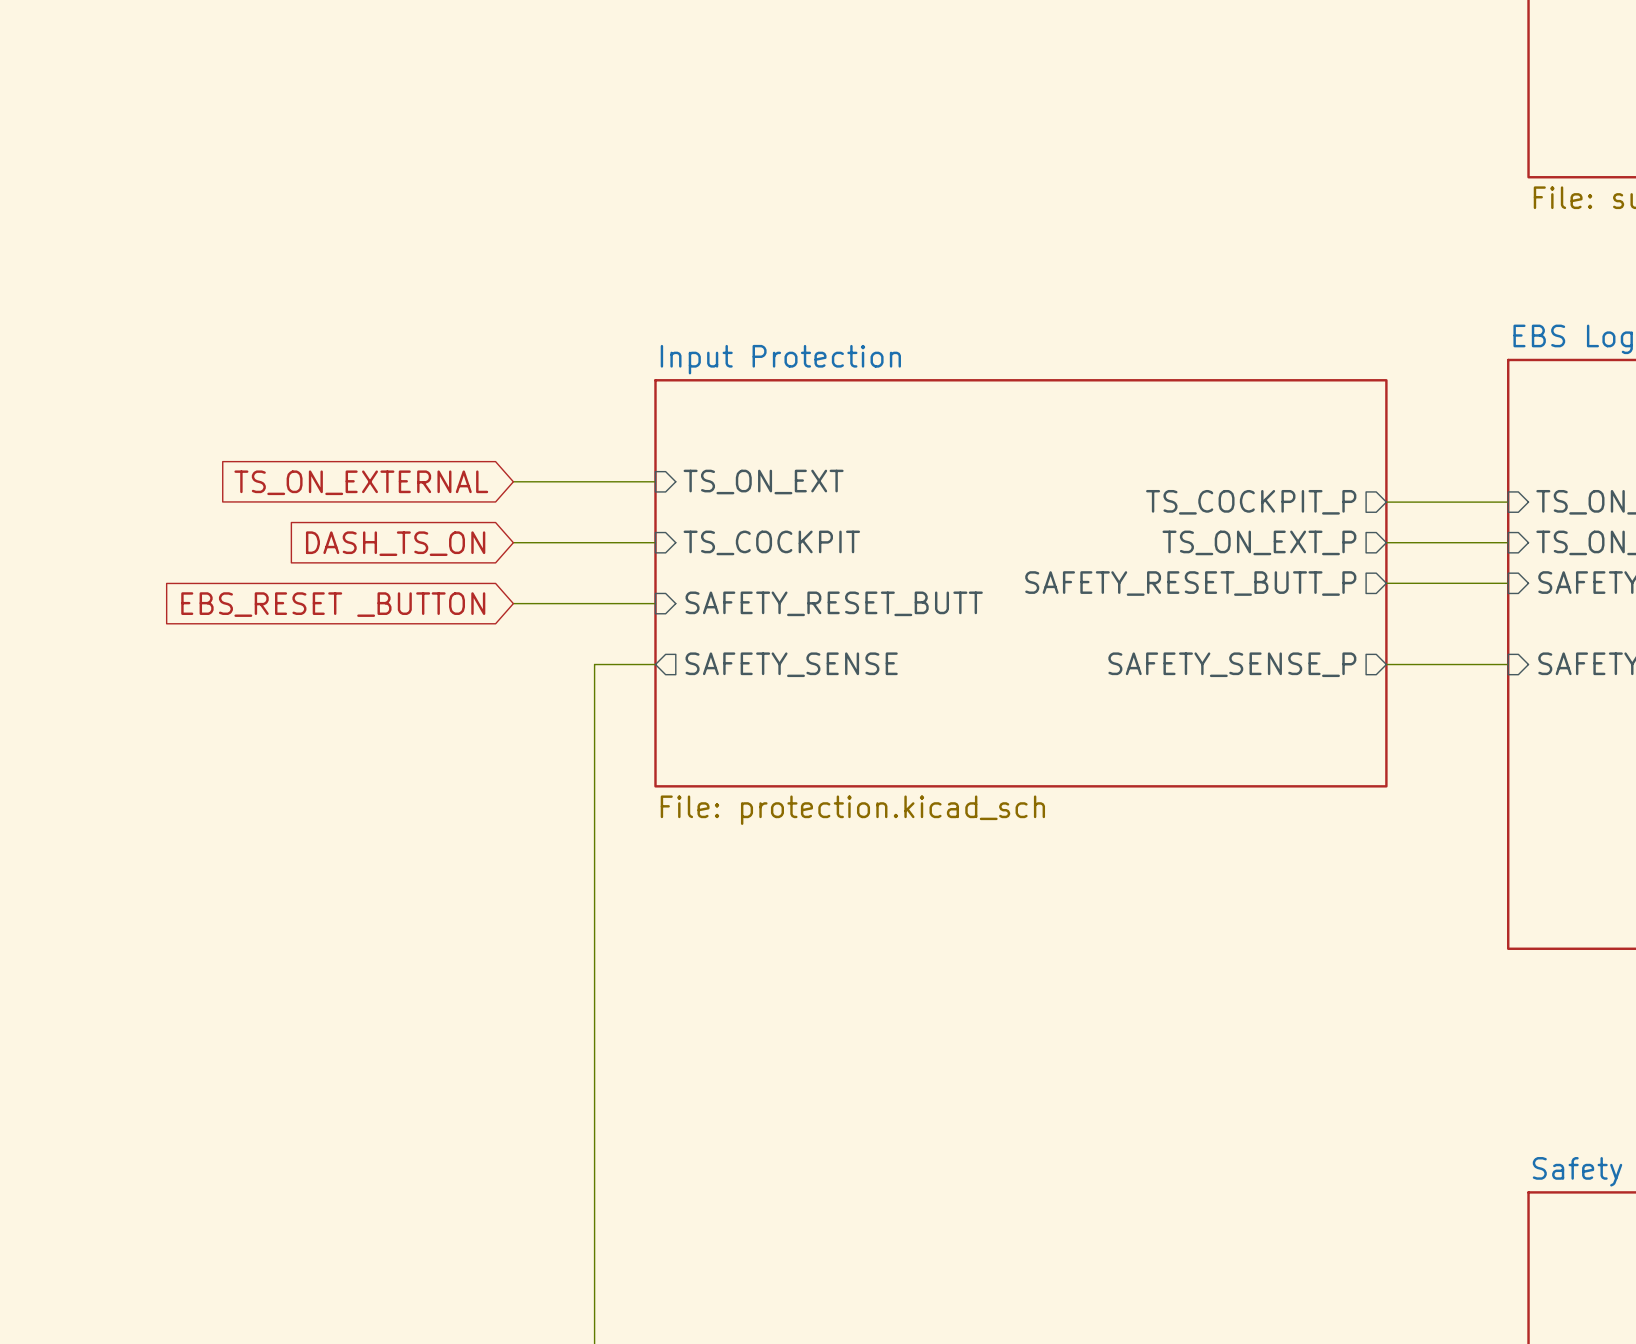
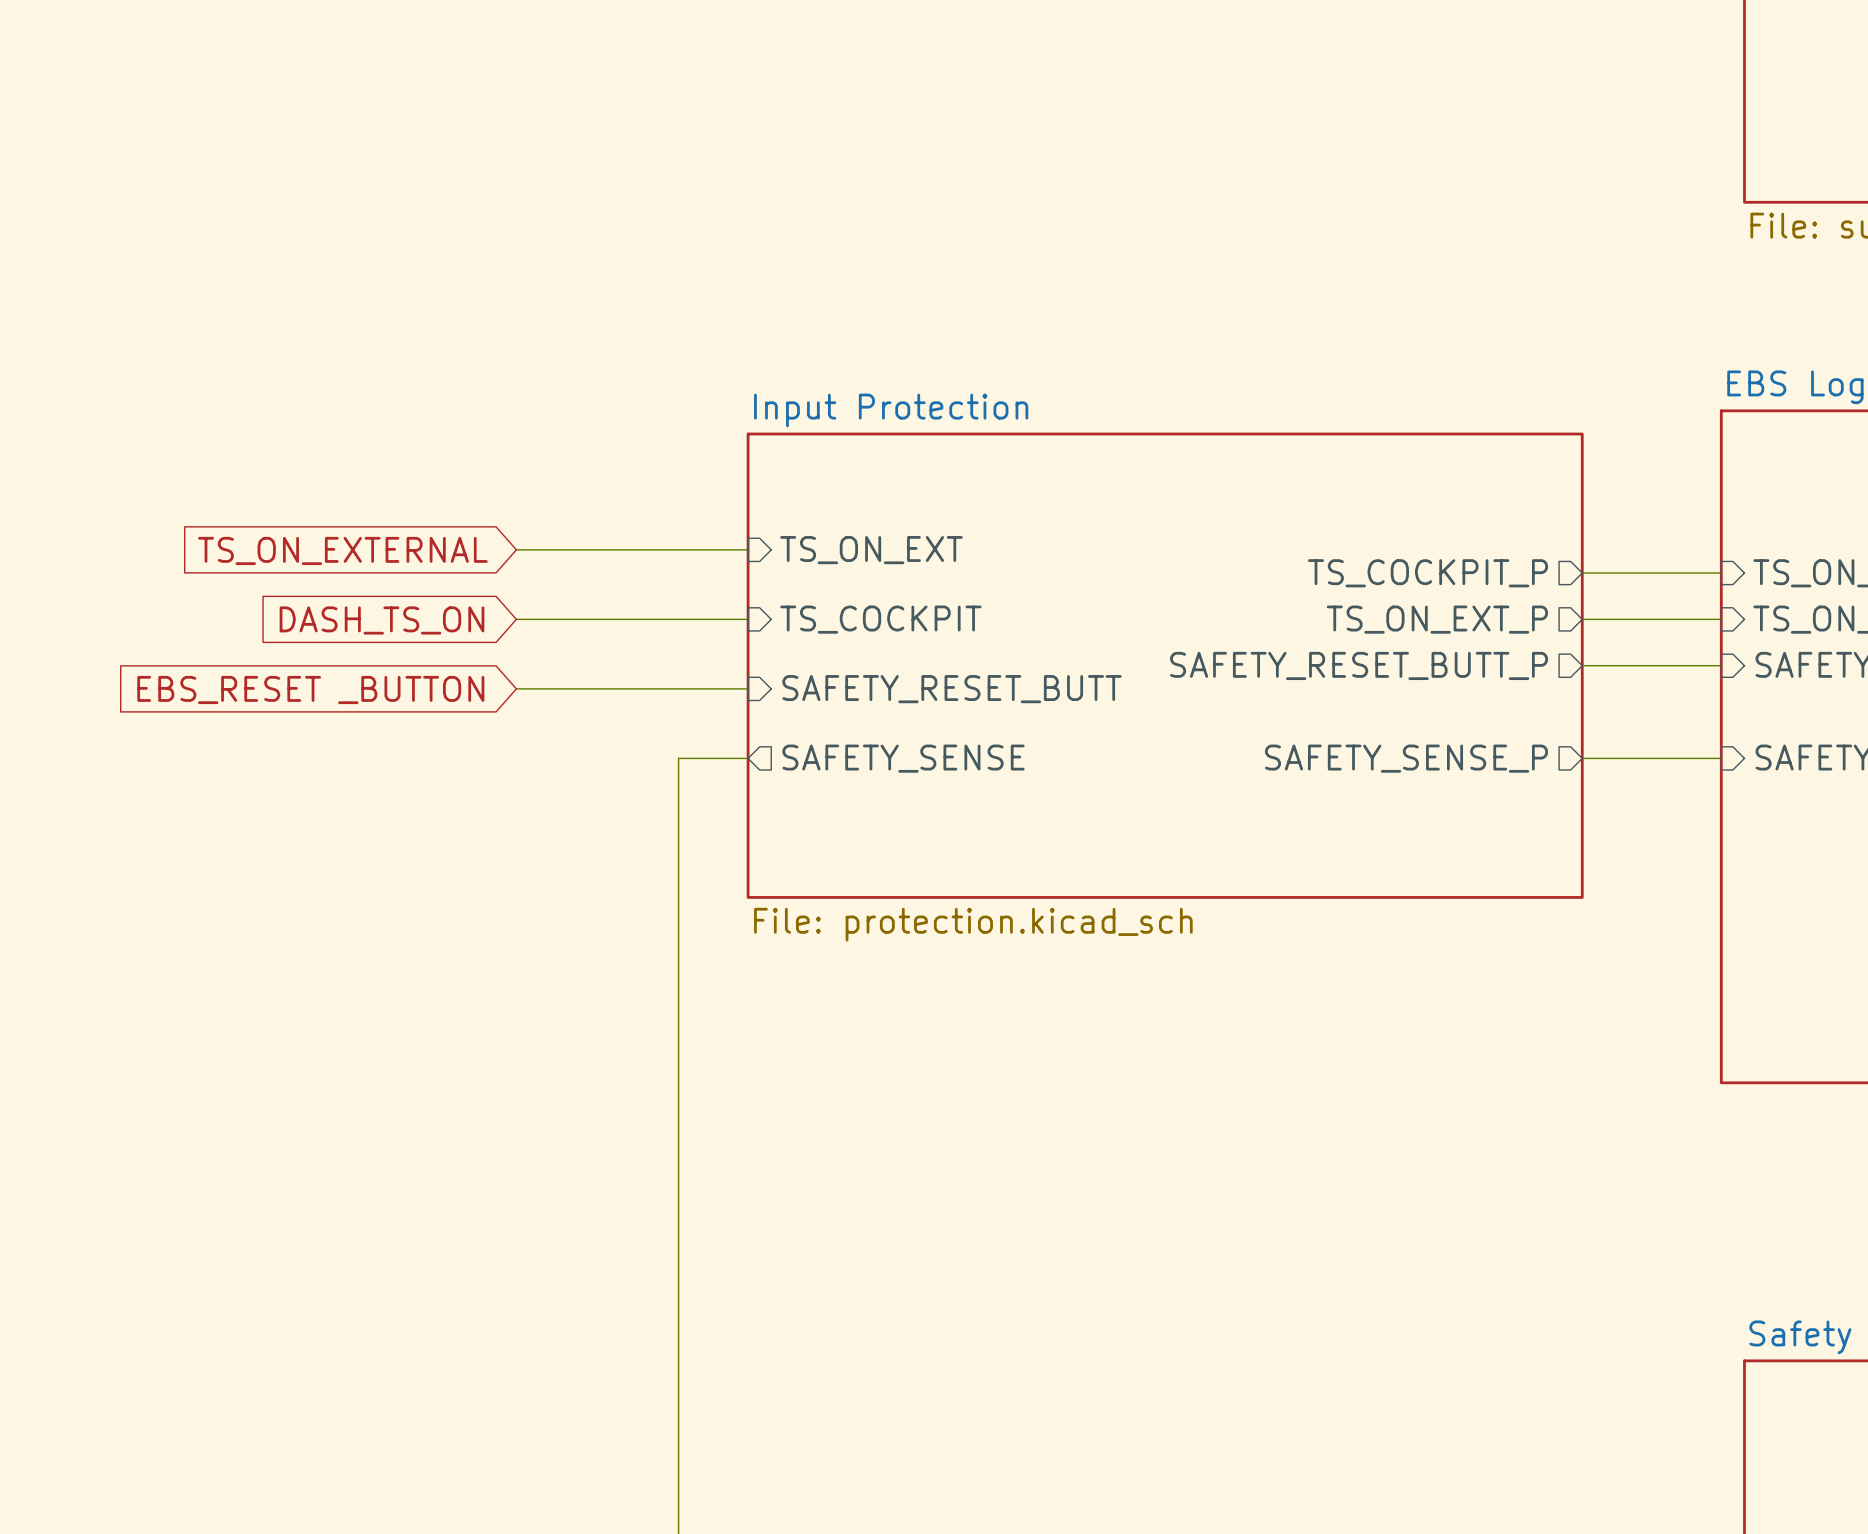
wire: none -> (516, 549) (585, 549)
global label position: TS_ON_EXTERNAL (361, 482) -> TS_ON_EXTERNAL (342, 550)
wire: none -> (516, 619) (585, 619)
global label position: DASH_TS_ON (395, 543) -> DASH_TS_ON (382, 620)
wire: none -> (516, 688) (585, 688)
global label position: EBS_RESET _BUTTON (333, 604) -> EBS_RESET _BUTTON (310, 689)

